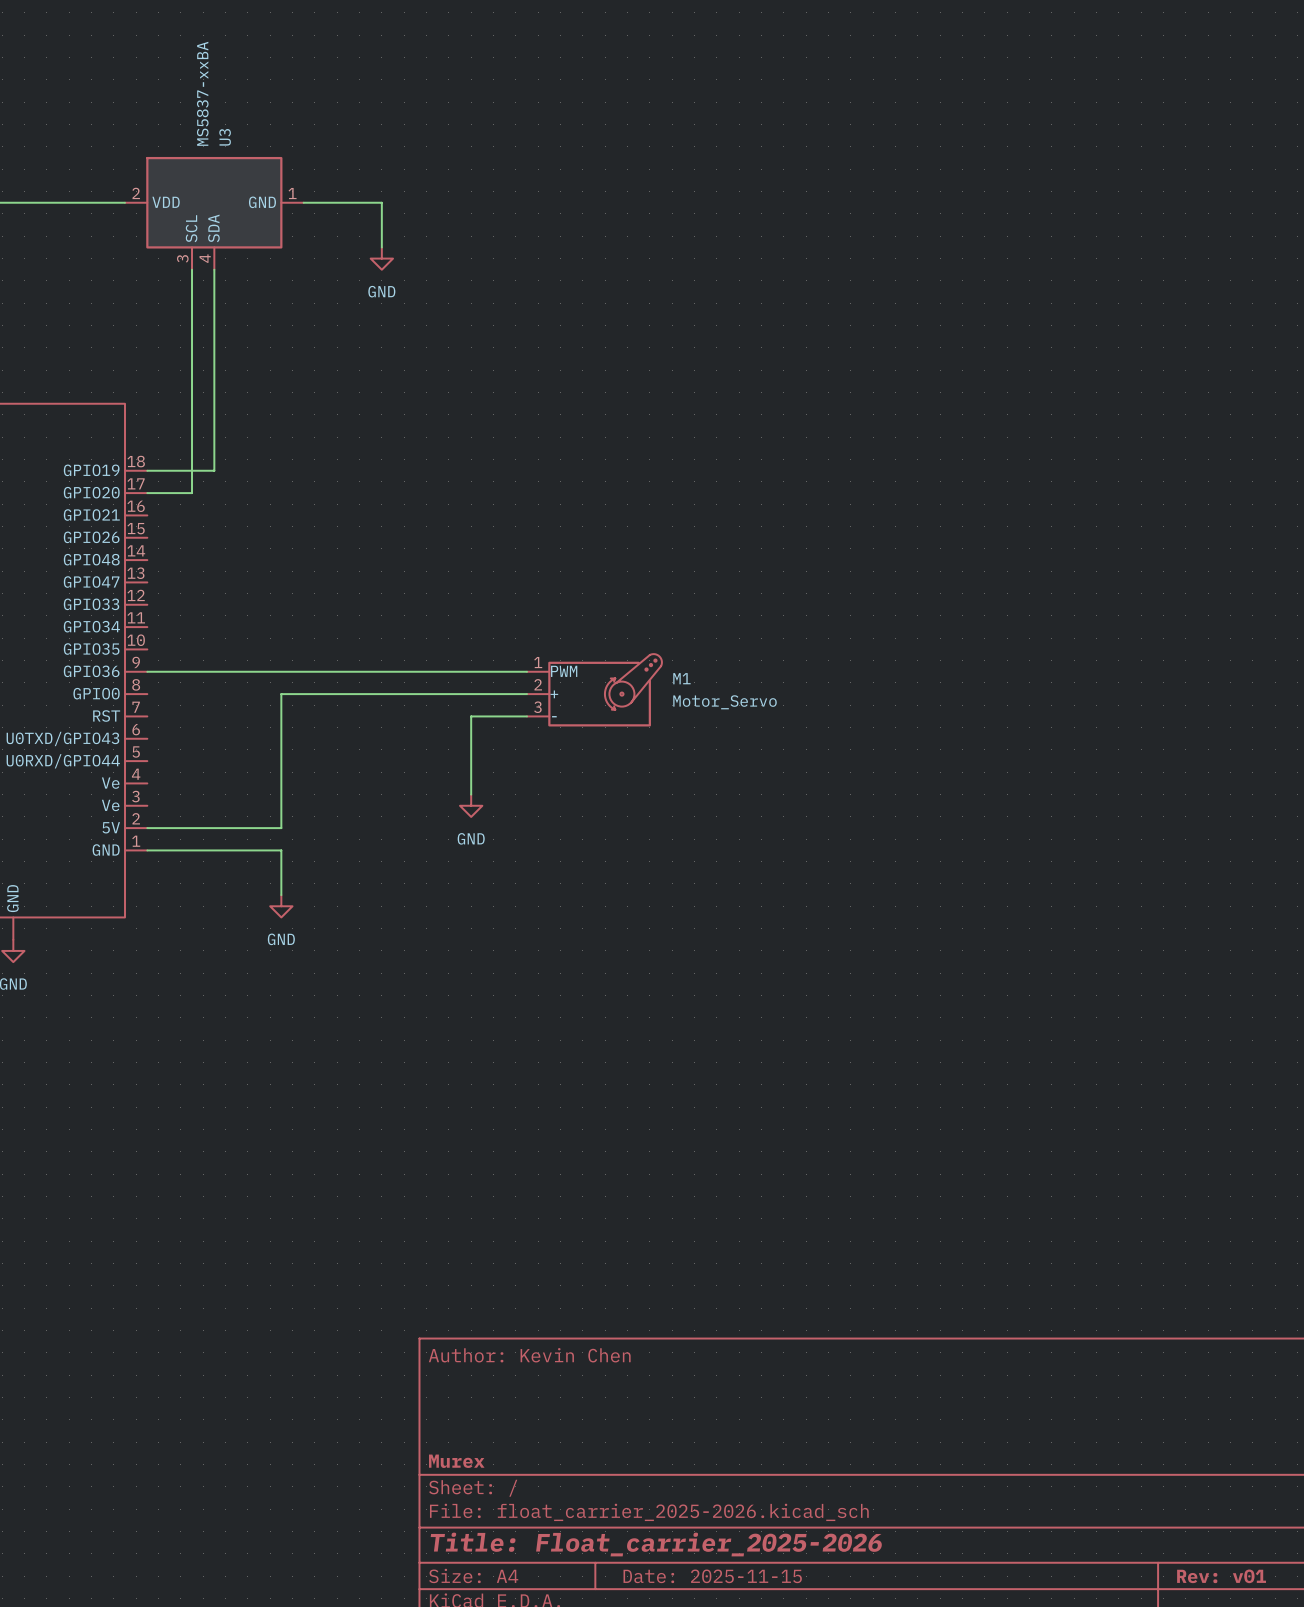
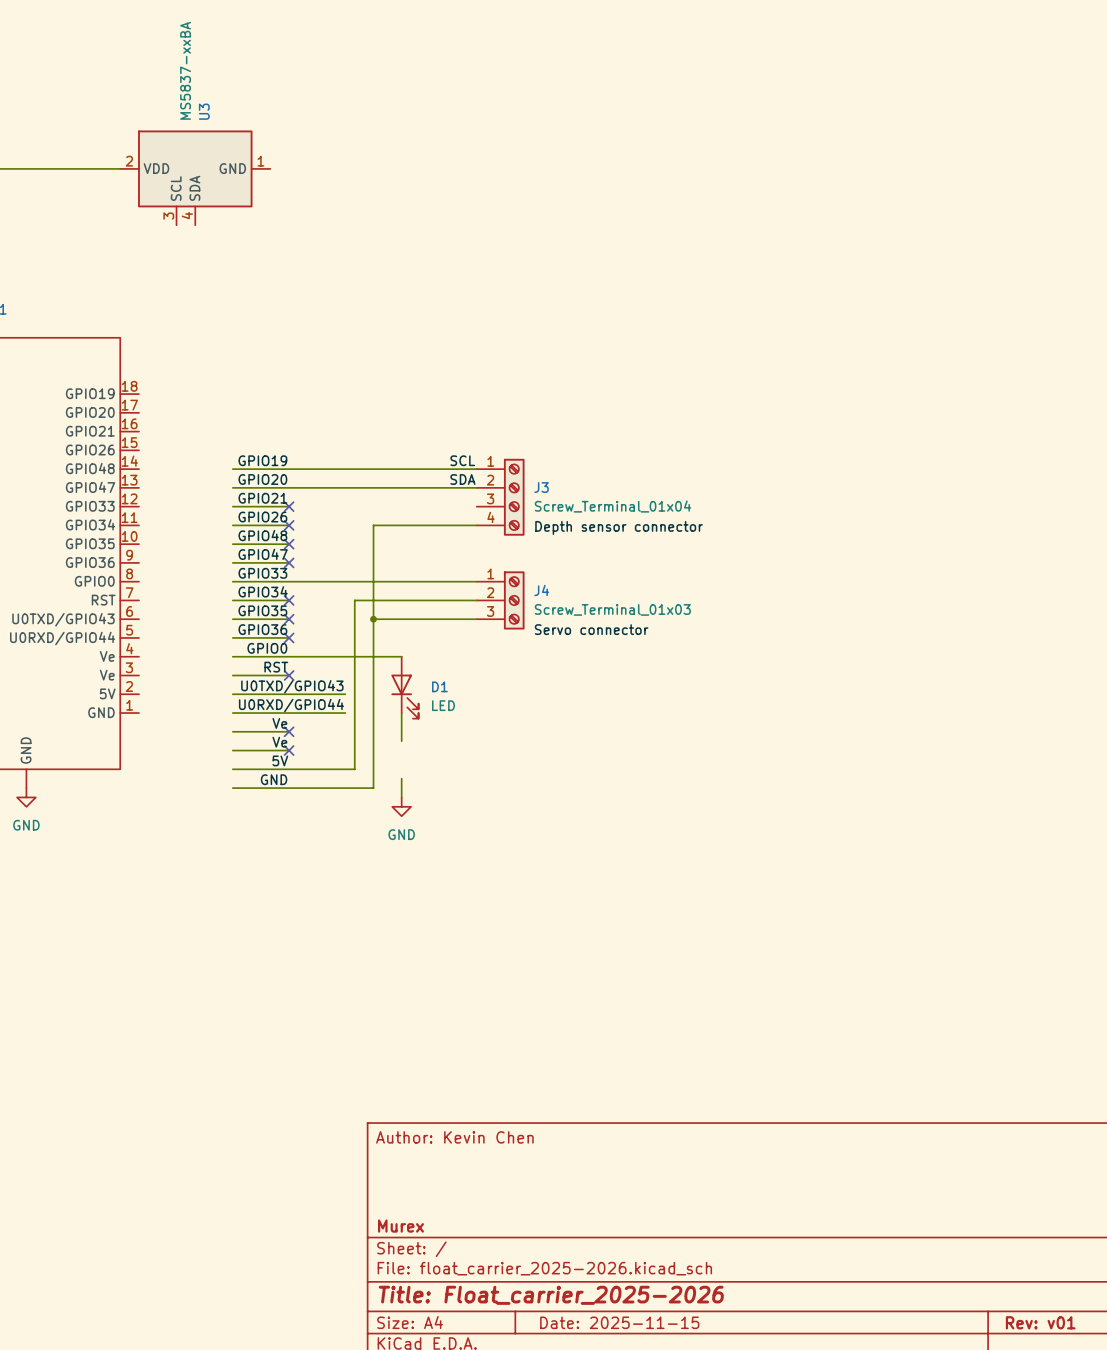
wire: (303, 202) (381, 202) (381, 247) -> none
power symbol: GND (381, 258) -> none
wire: (192, 269) (192, 493) (147, 493) -> none
wire: (214, 269) (214, 470) (147, 470) -> none
label: none -> GPIO19 (262, 460)
label: none -> SCL (462, 460)
wire: none -> (232, 469) (476, 469)
label: none -> GPIO20 (262, 479)
label: none -> SDA (462, 479)
wire: none -> (232, 487) (476, 487)
J3: none -> Screw_Terminal_01x04 (500, 497)
label: none -> GPIO21 (262, 498)
wire: none -> (232, 506) (289, 506)
no-connect mark: none -> (289, 506)
label: none -> GPIO26 (262, 517)
wire: none -> (232, 525) (289, 525)
no-connect mark: none -> (289, 525)
wire: none -> (476, 525) (373, 525) (373, 788) (232, 788)
label: none -> Depth sensor connector (619, 527)
label: none -> GPIO48 (262, 535)
wire: none -> (232, 544) (289, 544)
no-connect mark: none -> (289, 544)
label: none -> GPIO47 (263, 554)
wire: (147, 671) (259, 671) -> none
wire: (326, 671) (527, 671) -> (232, 656) (401, 656)
no-connect mark: none -> (289, 562)
label: none -> GPIO33 (262, 573)
M1: Motor_Servo (594, 690) -> none
wire: (281, 694) (281, 828) -> (251, 581) (232, 581)
label: none -> GPIO34 (263, 591)
wire: none -> (232, 600) (289, 600)
no-connect mark: none -> (289, 600)
wire: (471, 716) (471, 794) -> (411, 600) (354, 600) (354, 769) (232, 769)
J4: none -> Screw_Terminal_01x03 (500, 600)
label: none -> GPIO35 (262, 610)
wire: none -> (232, 619) (289, 619)
no-connect mark: none -> (289, 619)
wire: none -> (373, 619) (476, 619)
junction: none -> (373, 619)
label: none -> GPIO36 (262, 629)
label: none -> Servo connector (591, 629)
wire: none -> (232, 637) (289, 637)
no-connect mark: none -> (289, 637)
label: none -> GPIO0 (267, 648)
label: none -> RST (276, 667)
wire: none -> (232, 675) (289, 675)
no-connect mark: none -> (289, 675)
power symbol: GND (471, 805) -> none
label: none -> U0TXD/GPIO43 (292, 686)
D1: none -> LED (404, 687)
wire: (147, 828) (259, 828) -> (251, 694) (345, 694)
label: none -> U0RXD/GPIO44 (291, 705)
wire: (147, 850) (259, 850) -> none
wire: (281, 850) (281, 895) -> (251, 713) (345, 713)
wire: none -> (401, 713) (401, 741)
label: none -> Ve (279, 723)
wire: none -> (232, 731) (289, 731)
no-connect mark: none -> (289, 731)
label: none -> Ve (279, 742)
wire: none -> (232, 750) (289, 750)
no-connect mark: none -> (289, 750)
power symbol: GND (281, 906) -> none
label: none -> 5V (280, 760)
wire: none -> (401, 778) (401, 797)
label: none -> GND (274, 779)
power symbol: none -> GND (401, 806)

